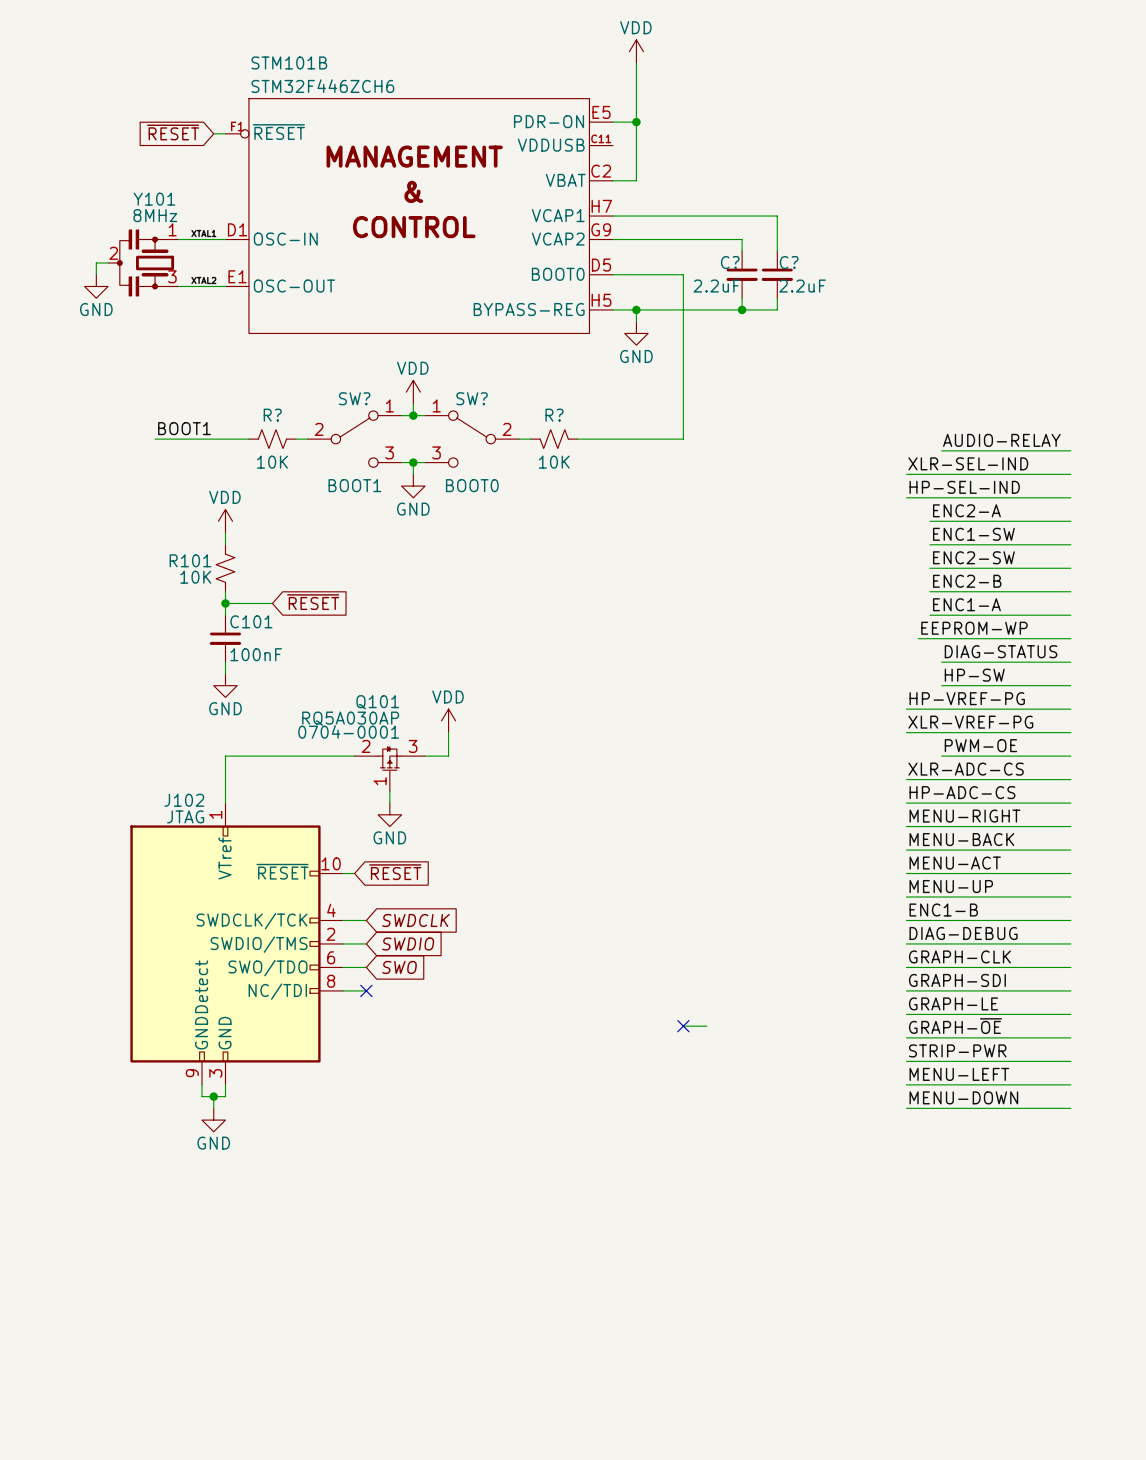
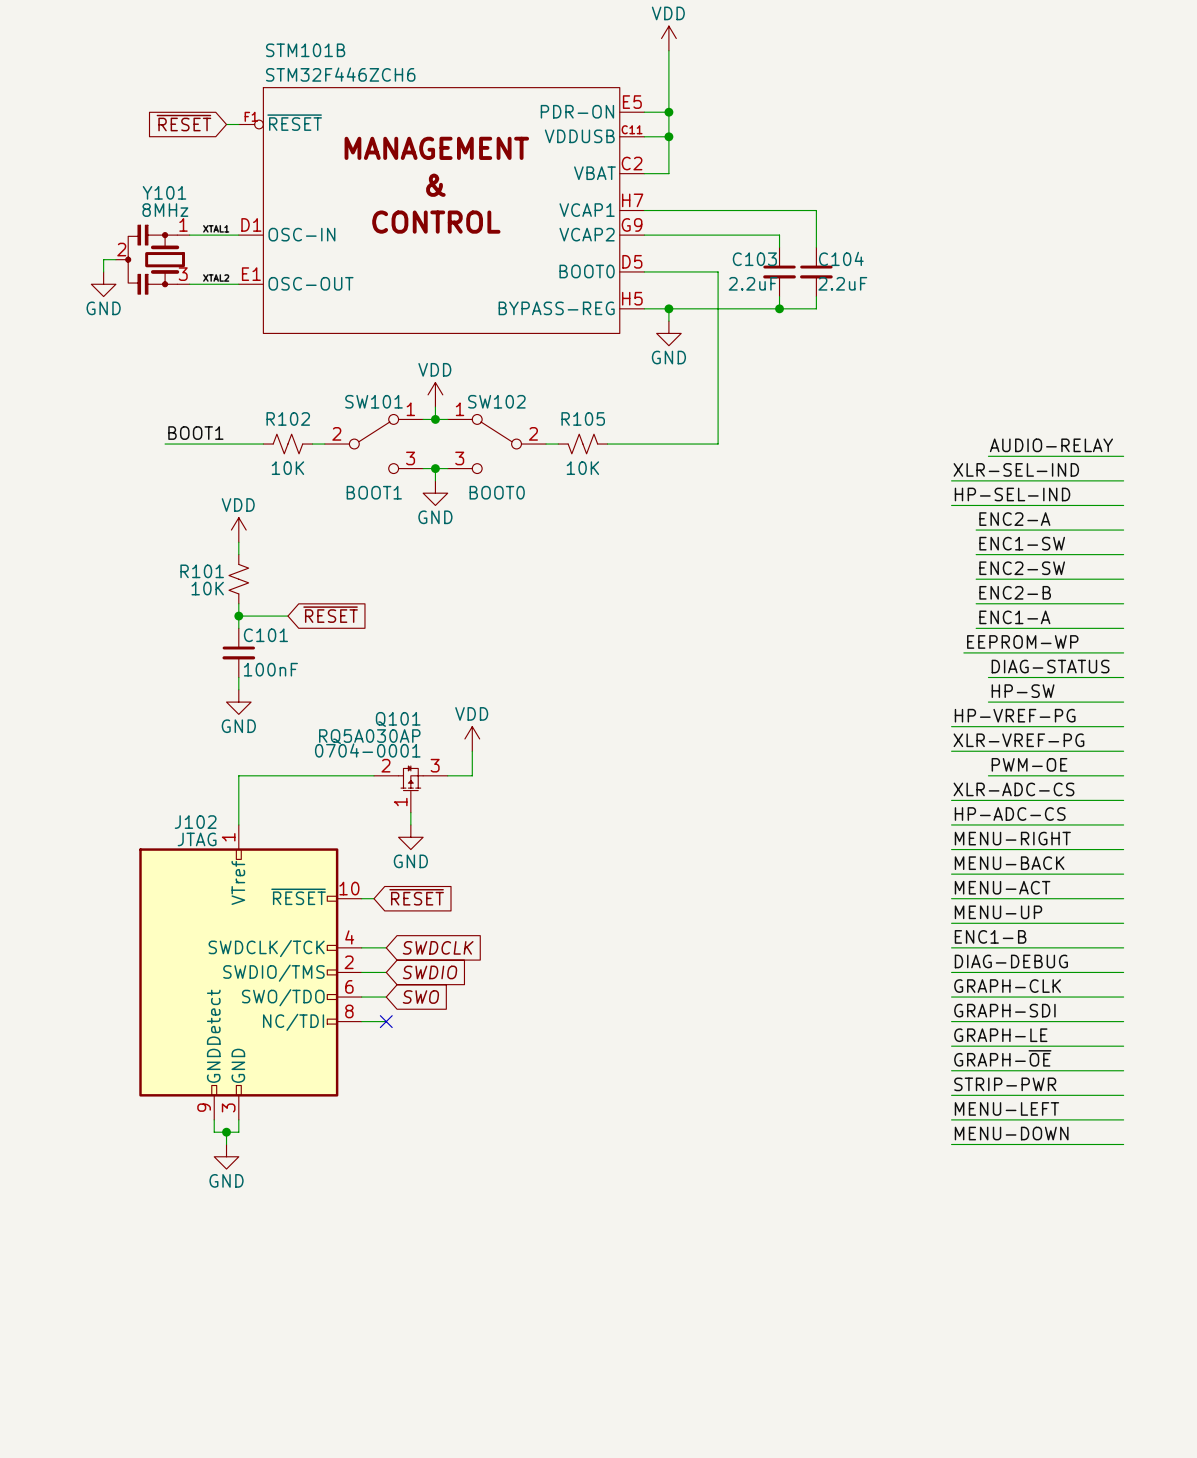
wire: none -> (644, 136) (668, 136)
junction: none -> (668, 136)
C? name: C? (730, 262) -> C103 (754, 259)
C? name: C? (789, 262) -> C104 (841, 258)
SW? name: SW? (354, 398) -> SW101 (373, 401)
SW? name: SW? (472, 398) -> SW102 (496, 401)
R? name: R? (272, 415) -> R102 (288, 418)
R? name: R? (554, 415) -> R105 (583, 418)
wire: (683, 1026) (706, 1026) -> none
no-connect mark: (683, 1026) -> none

